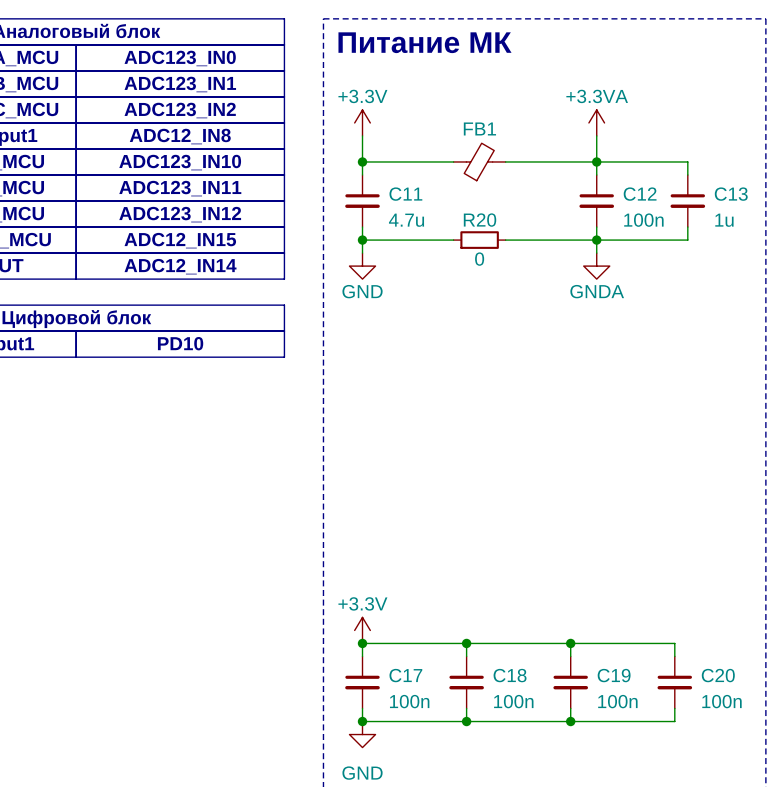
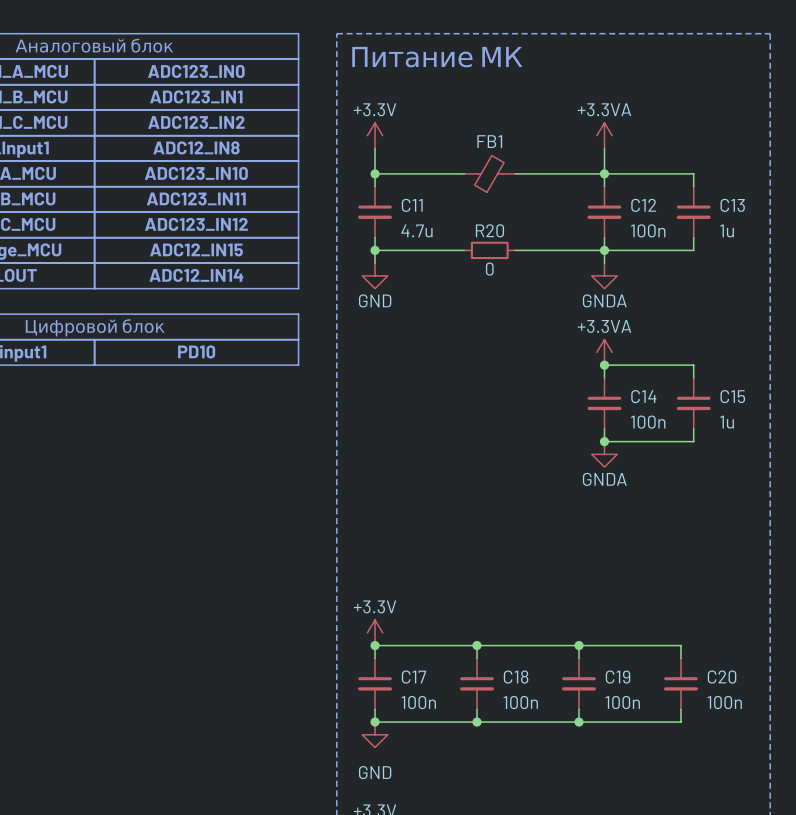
power symbol: none -> +3.3VA (604, 352)
junction: none -> (604, 365)
wire: none -> (604, 377) (604, 365) (693, 365) (693, 377)
C14: none -> 100n (604, 403)
C15: none -> 1u (693, 403)
wire: none -> (604, 428) (604, 441) (693, 441) (693, 428)
junction: none -> (604, 441)
power symbol: none -> GNDA (604, 454)

